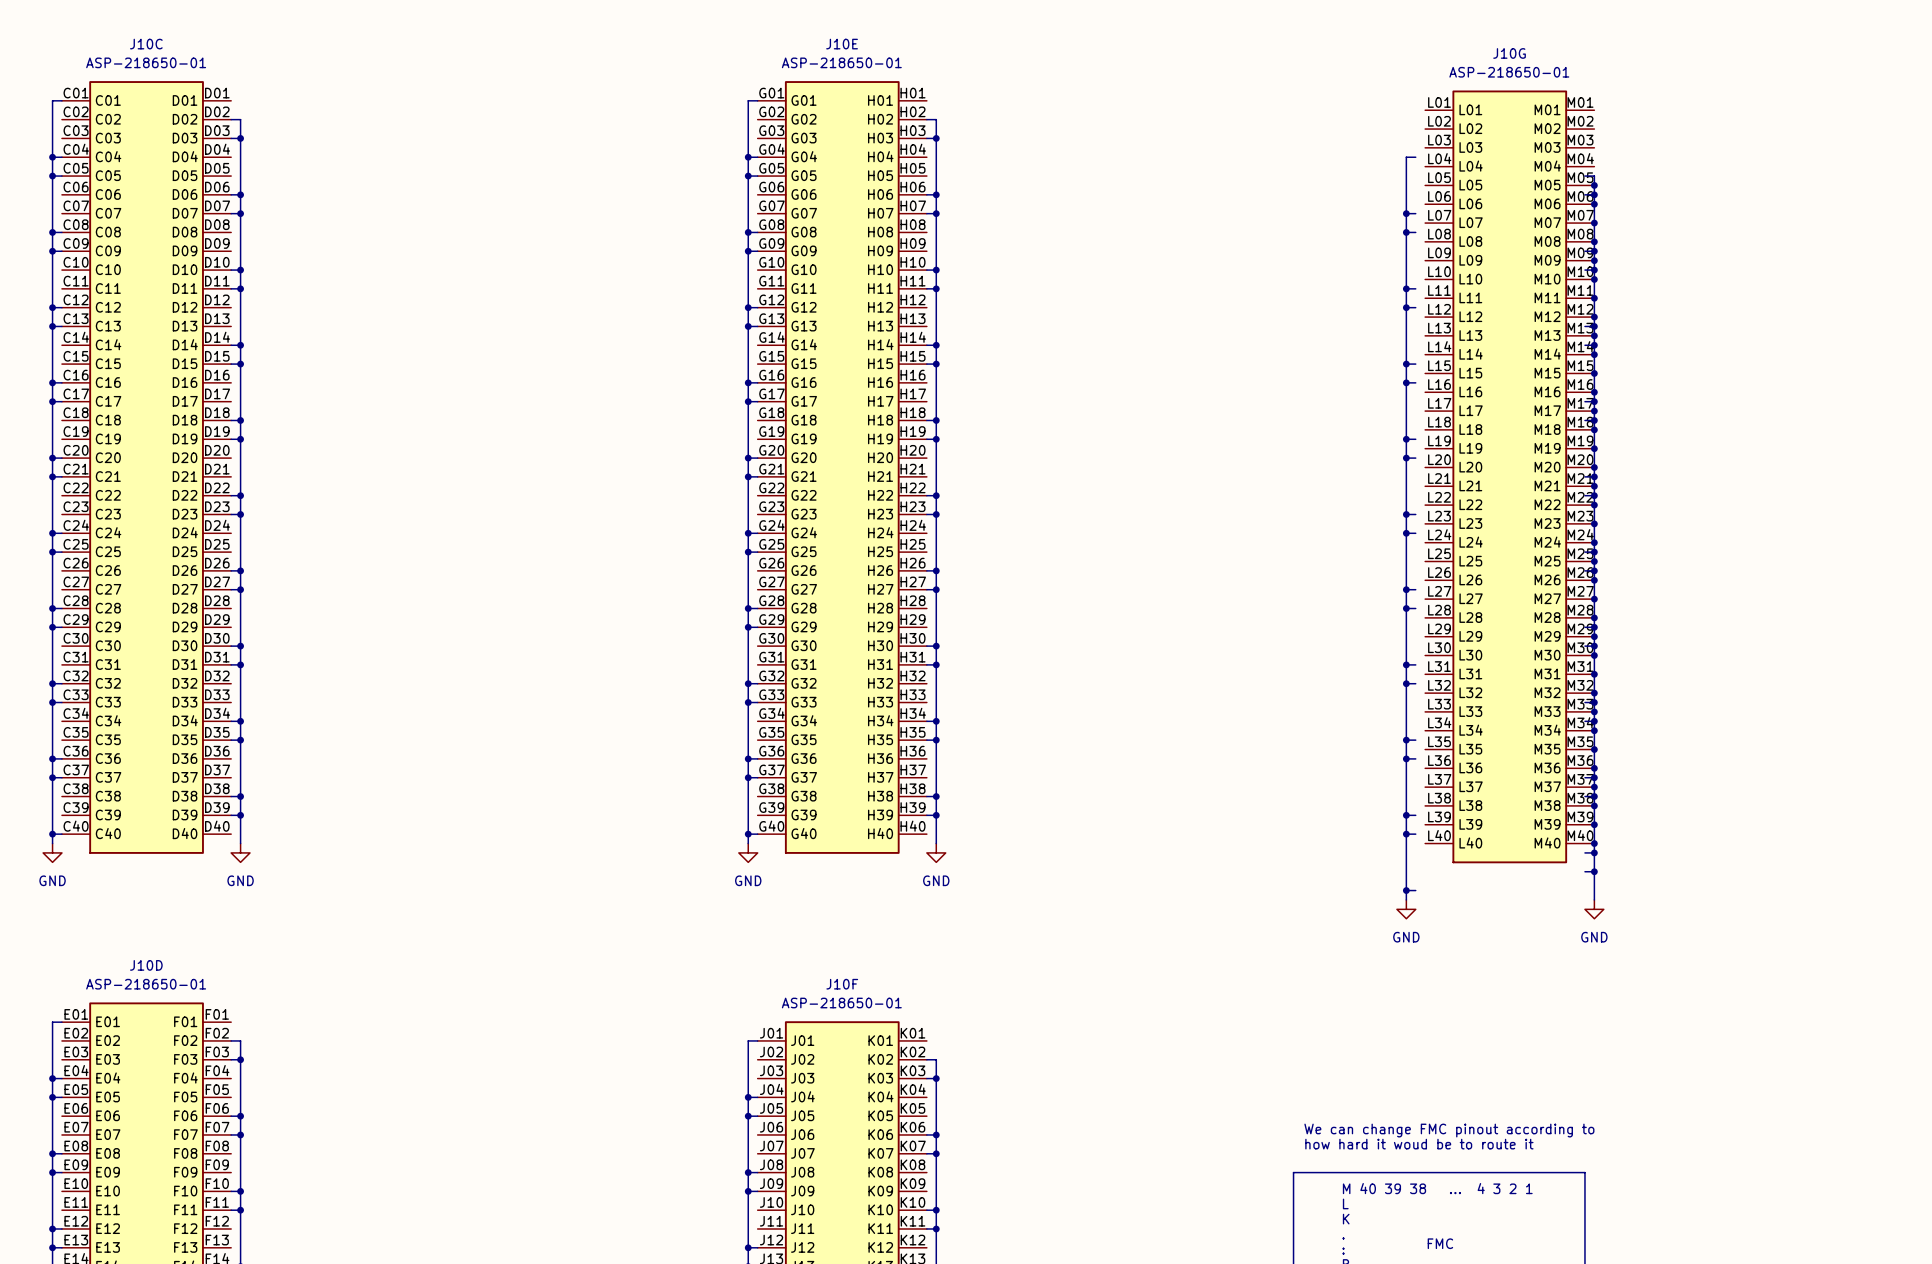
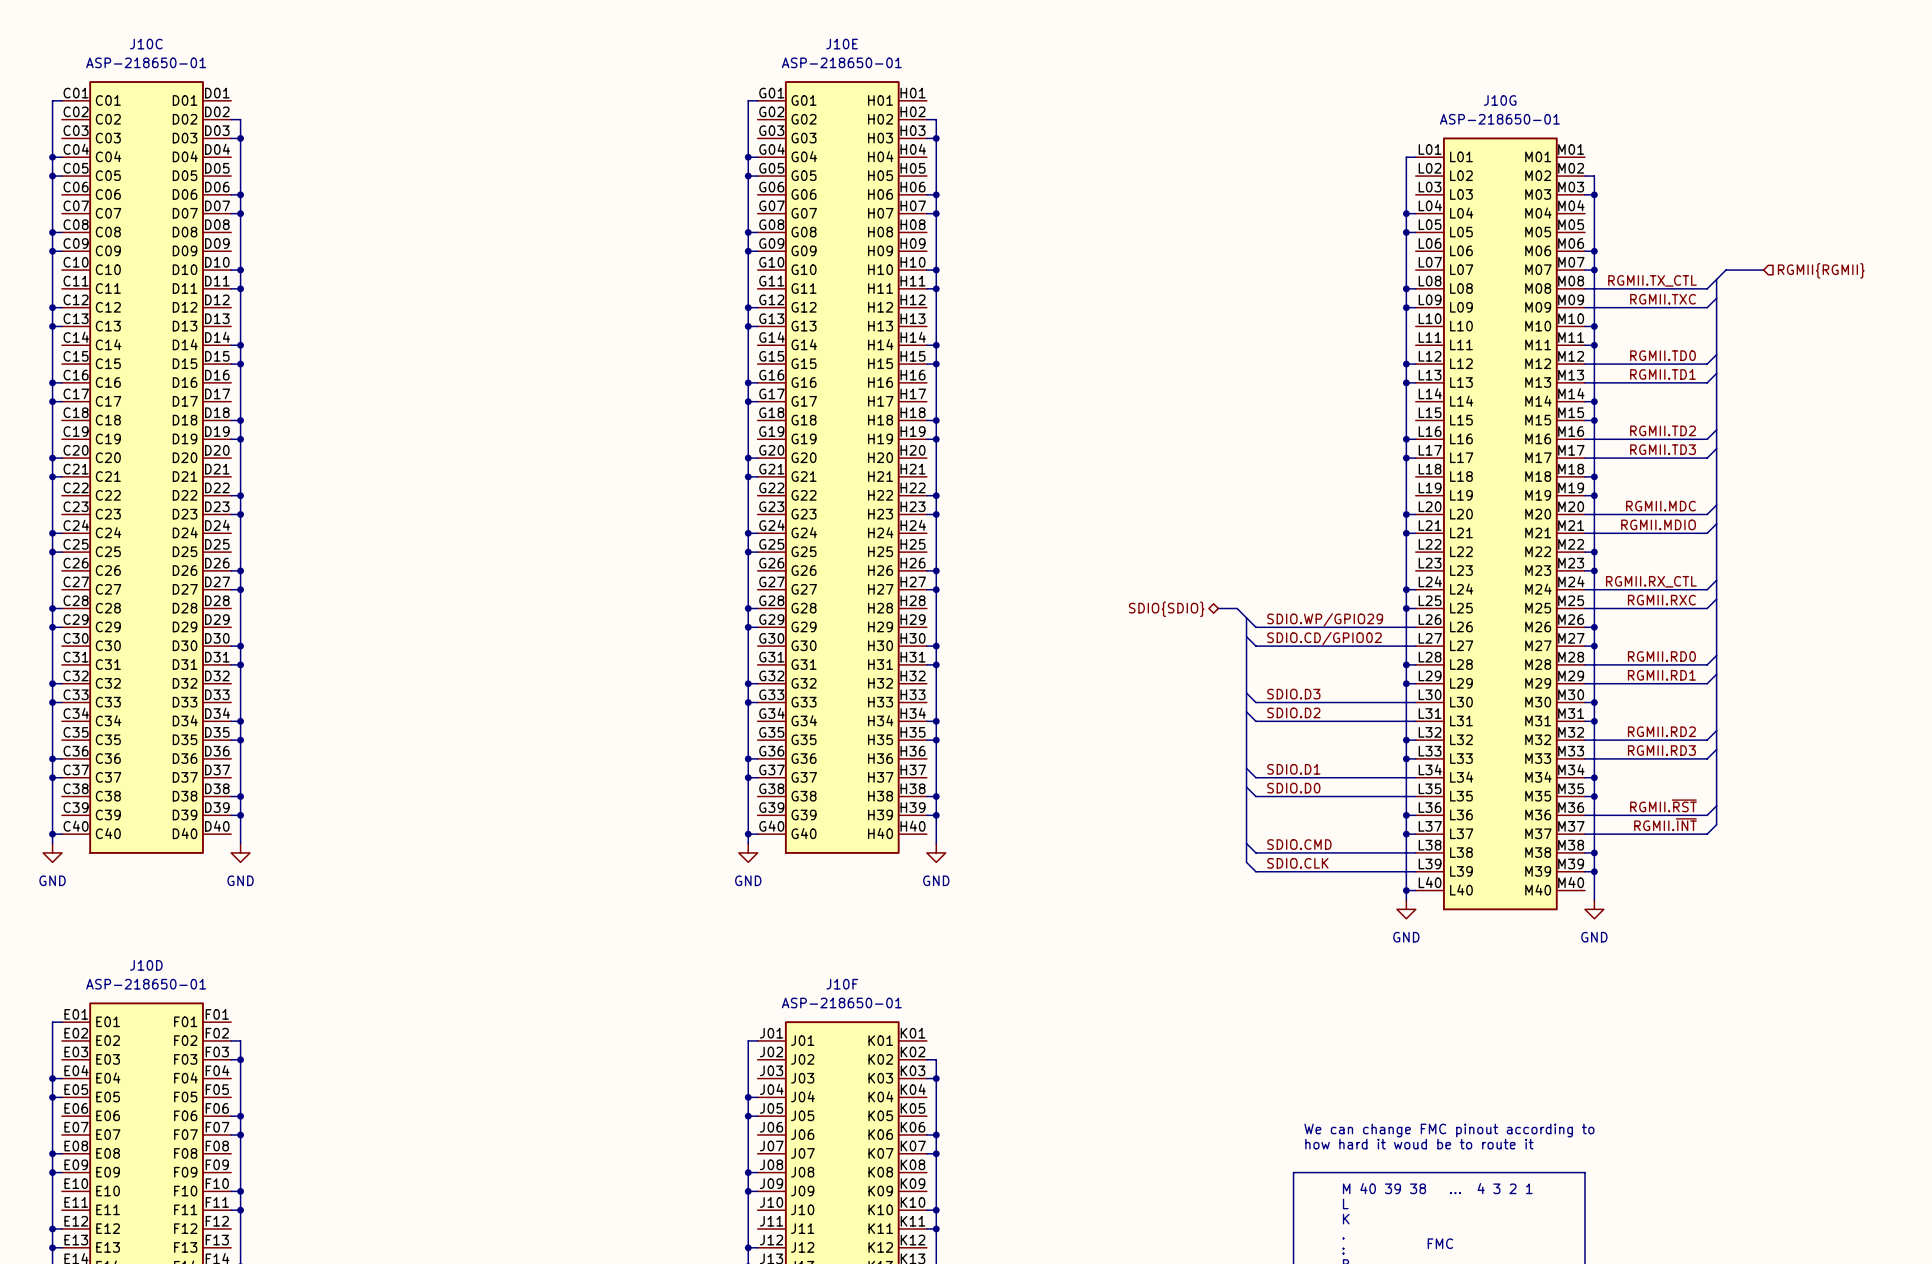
junction: (1594, 185) -> none
junction: (1594, 204) -> none
junction: (1594, 223) -> none
junction: (1594, 241) -> none
junction: (1594, 260) -> none
bus: none -> (1763, 270) (1726, 270) (1716, 279) (1716, 824)
hierarchical label: none -> RGMII{RGMII} (1821, 270)
junction: (1594, 279) -> none
wire: none -> (1716, 279) (1707, 288) (1584, 288)
label: none -> RGMII.TX_CTL (1652, 280)
junction: (1594, 298) -> none
wire: none -> (1716, 298) (1707, 307) (1584, 307)
label: none -> RGMII.TXC (1663, 299)
junction: (1594, 317) -> none
junction: (1594, 335) -> none
junction: (1594, 354) -> none
wire: none -> (1716, 354) (1707, 364) (1584, 364)
label: none -> RGMII.TD0 (1663, 355)
junction: (1594, 373) -> none
wire: none -> (1716, 373) (1707, 382) (1584, 382)
label: none -> RGMII.TD1 (1663, 374)
junction: (1594, 392) -> none
junction: (1594, 411) -> none
junction: (1594, 429) -> none
wire: none -> (1716, 429) (1707, 439) (1584, 439)
label: none -> RGMII.TD2 (1663, 430)
junction: (1594, 448) -> none
wire: none -> (1716, 448) (1707, 458) (1584, 458)
label: none -> RGMII.TD3 (1663, 449)
junction: (1594, 467) -> none
J10G position: (1509, 476) -> (1500, 523)
junction: (1594, 486) -> none
junction: (1594, 505) -> none
wire: none -> (1716, 505) (1707, 514) (1584, 514)
label: none -> RGMII.MDC (1661, 506)
junction: (1594, 523) -> none
wire: none -> (1716, 523) (1707, 533) (1584, 533)
label: none -> RGMII.MDIO (1658, 524)
junction: (1594, 542) -> none
junction: (1594, 561) -> none
junction: (1594, 580) -> none
wire: none -> (1716, 580) (1707, 589) (1584, 589)
label: none -> RGMII.RX_CTL (1651, 581)
junction: (1594, 599) -> none
wire: none -> (1716, 599) (1707, 608) (1584, 608)
label: none -> RGMII.RXC (1661, 600)
bus: none -> (1218, 608) (1237, 608) (1246, 617) (1246, 862)
hierarchical label: none -> SDIO{SDIO} (1166, 609)
wire: none -> (1246, 617) (1255, 627) (1415, 627)
junction: (1594, 617) -> none
label: none -> SDIO.WP/GPIO29 (1325, 619)
wire: none -> (1246, 636) (1255, 646) (1415, 646)
junction: (1594, 636) -> none
label: none -> SDIO.CD/GPIO02 (1324, 638)
junction: (1594, 655) -> none
wire: none -> (1716, 655) (1707, 664) (1584, 664)
label: none -> RGMII.RD0 (1661, 656)
junction: (1594, 674) -> none
wire: none -> (1716, 674) (1707, 683) (1584, 683)
label: none -> RGMII.RD1 (1661, 675)
wire: none -> (1246, 693) (1255, 702) (1415, 702)
junction: (1594, 693) -> none
label: none -> SDIO.D3 (1293, 694)
wire: none -> (1246, 711) (1255, 721) (1415, 721)
junction: (1594, 711) -> none
label: none -> SDIO.D2 (1293, 712)
junction: (1594, 730) -> none
wire: none -> (1716, 730) (1707, 740) (1584, 740)
label: none -> RGMII.RD2 (1661, 731)
junction: (1594, 749) -> none
wire: none -> (1716, 749) (1707, 758) (1584, 758)
label: none -> RGMII.RD3 (1661, 750)
wire: none -> (1246, 768) (1255, 777) (1415, 777)
junction: (1594, 768) -> none
label: none -> SDIO.D1 (1293, 769)
wire: none -> (1246, 787) (1255, 796) (1415, 796)
junction: (1594, 787) -> none
label: none -> SDIO.D0 (1293, 788)
junction: (1594, 805) -> none
label: none -> RGMII.~{RST} (1663, 805)
wire: none -> (1716, 805) (1707, 815) (1584, 815)
junction: (1594, 824) -> none
label: none -> RGMII.~{INT} (1665, 824)
wire: none -> (1716, 824) (1707, 834) (1584, 834)
wire: none -> (1246, 843) (1255, 852) (1415, 852)
junction: (1594, 843) -> none
label: none -> SDIO.CMD (1299, 844)
wire: none -> (1246, 862) (1255, 871) (1415, 871)
label: none -> SDIO.CLK (1297, 863)

